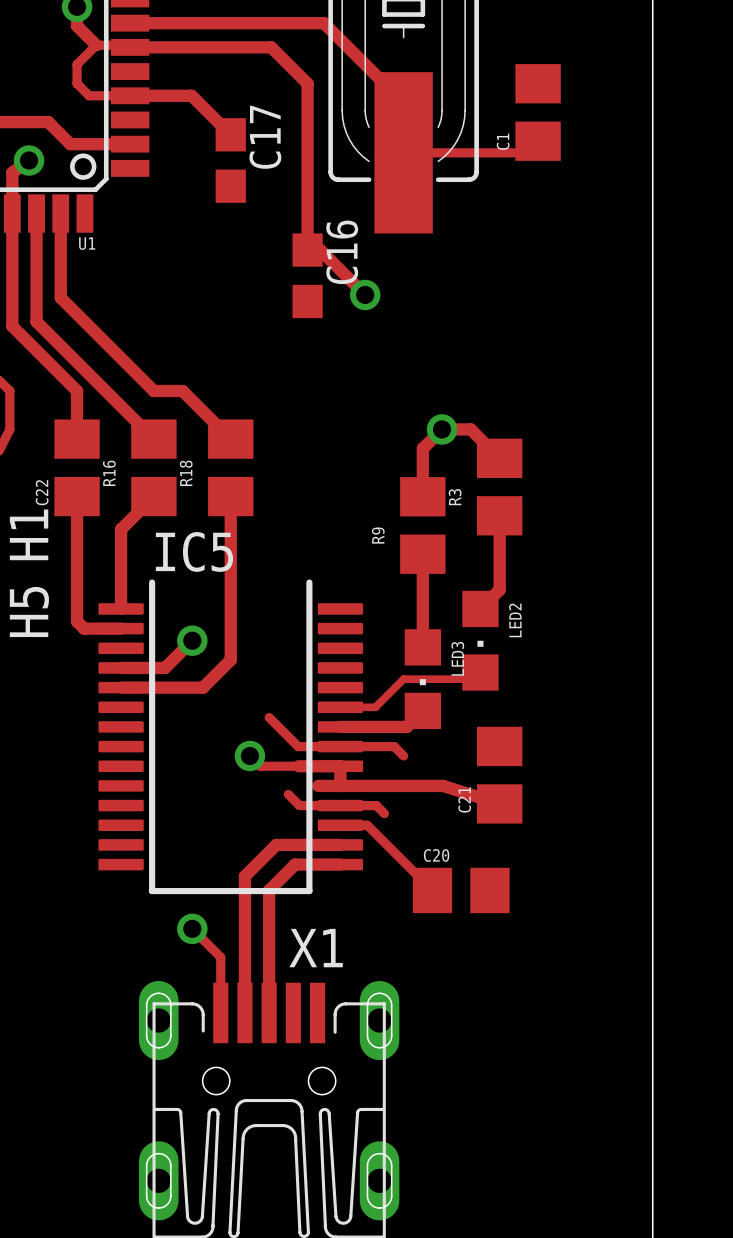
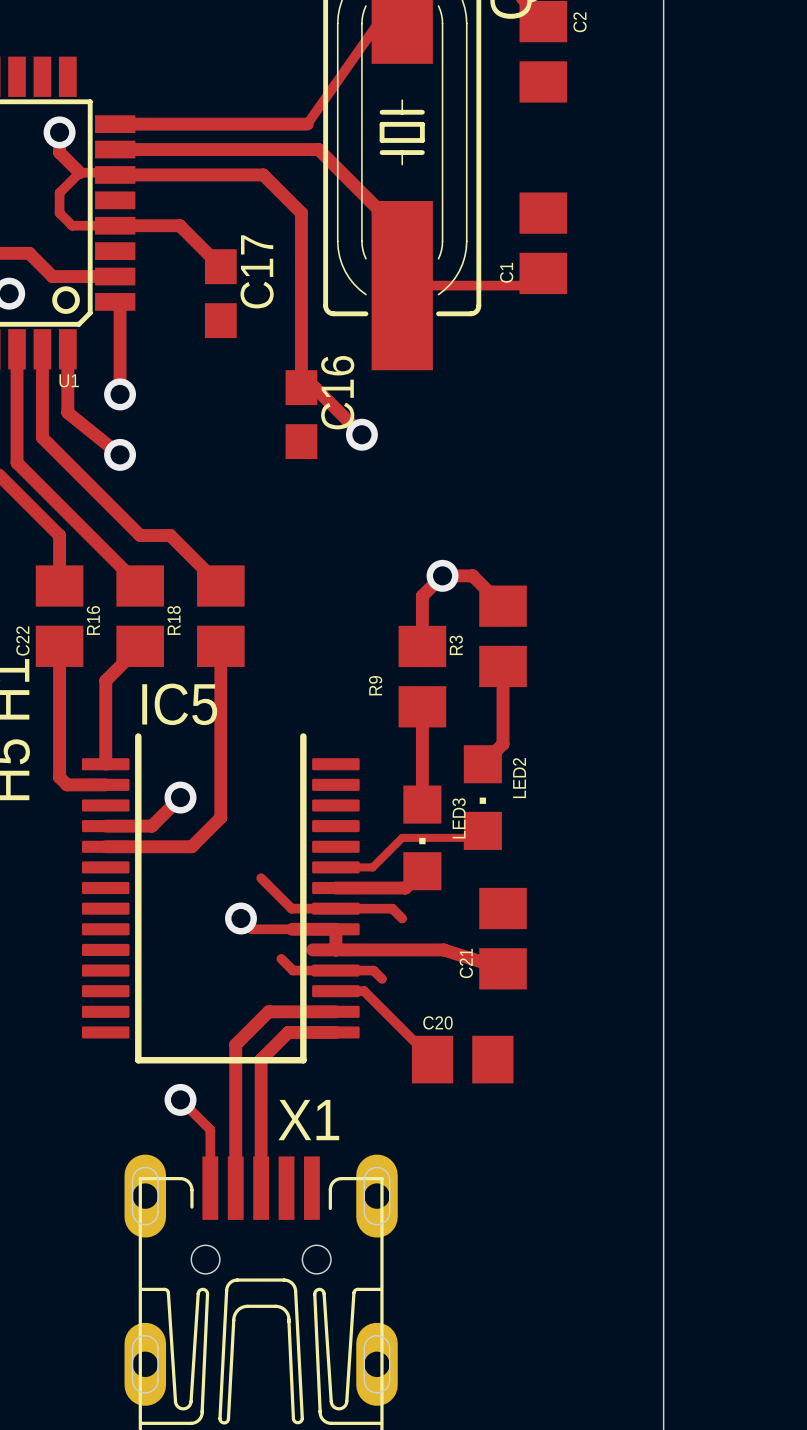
track: none -> (115, 301) (120, 306) (120, 394)
track: none -> (67, 349) (67, 412) (120, 454)
via: none -> (120, 394)
via: none -> (120, 454)

